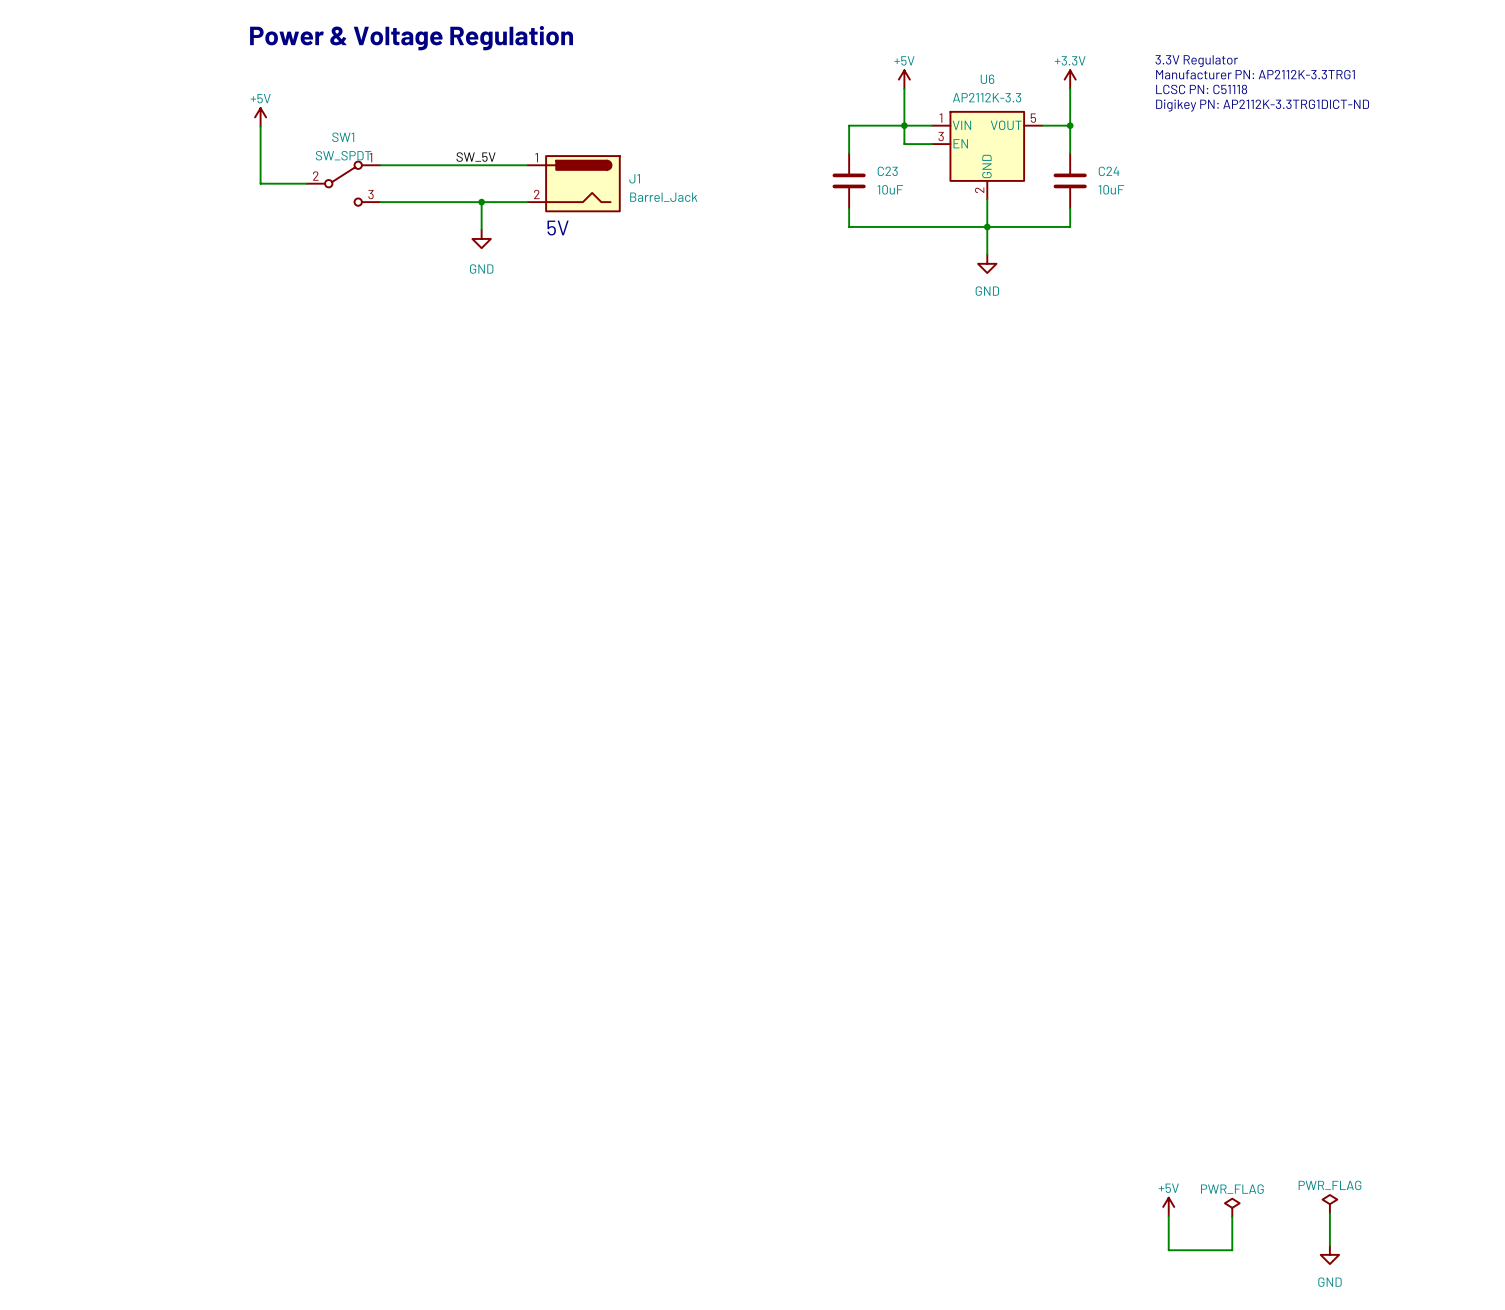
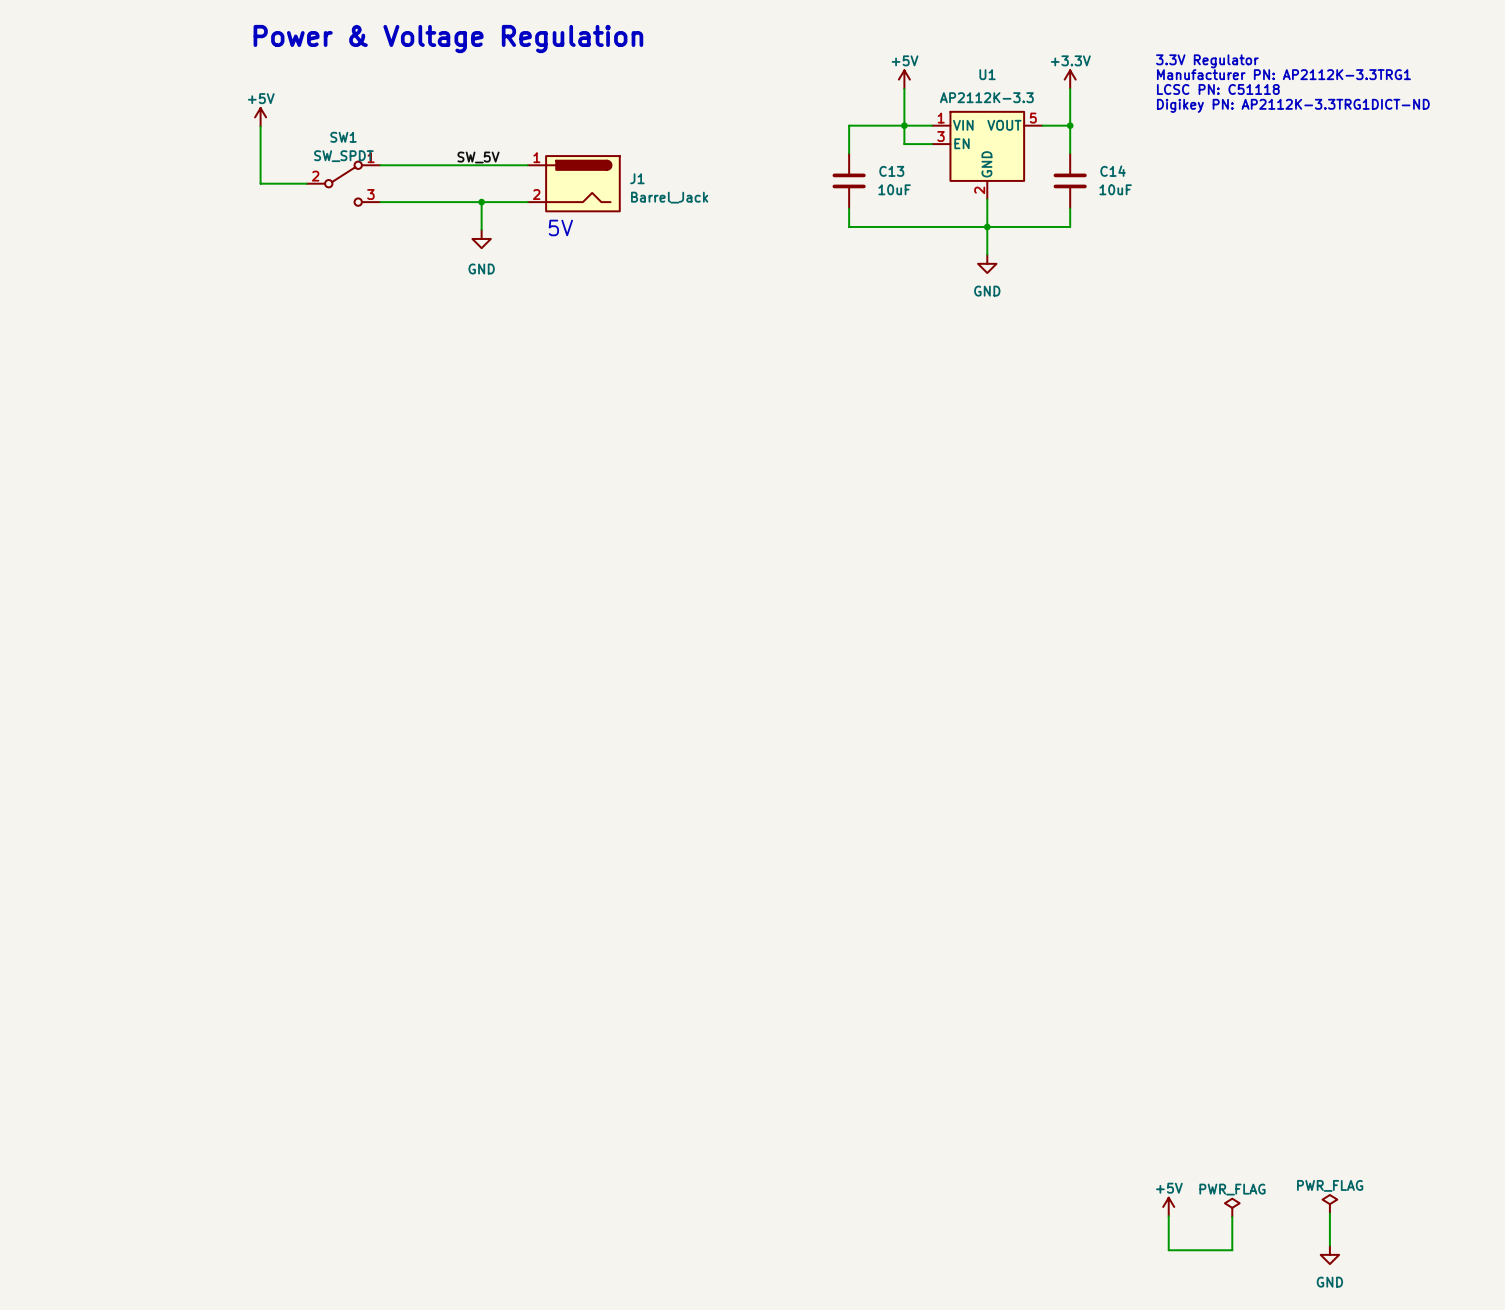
U6 name: U6 (987, 79) -> U1 (987, 74)
C23 name: C23 (887, 171) -> C13 (891, 171)
C24 name: C24 (1109, 171) -> C14 (1113, 171)

